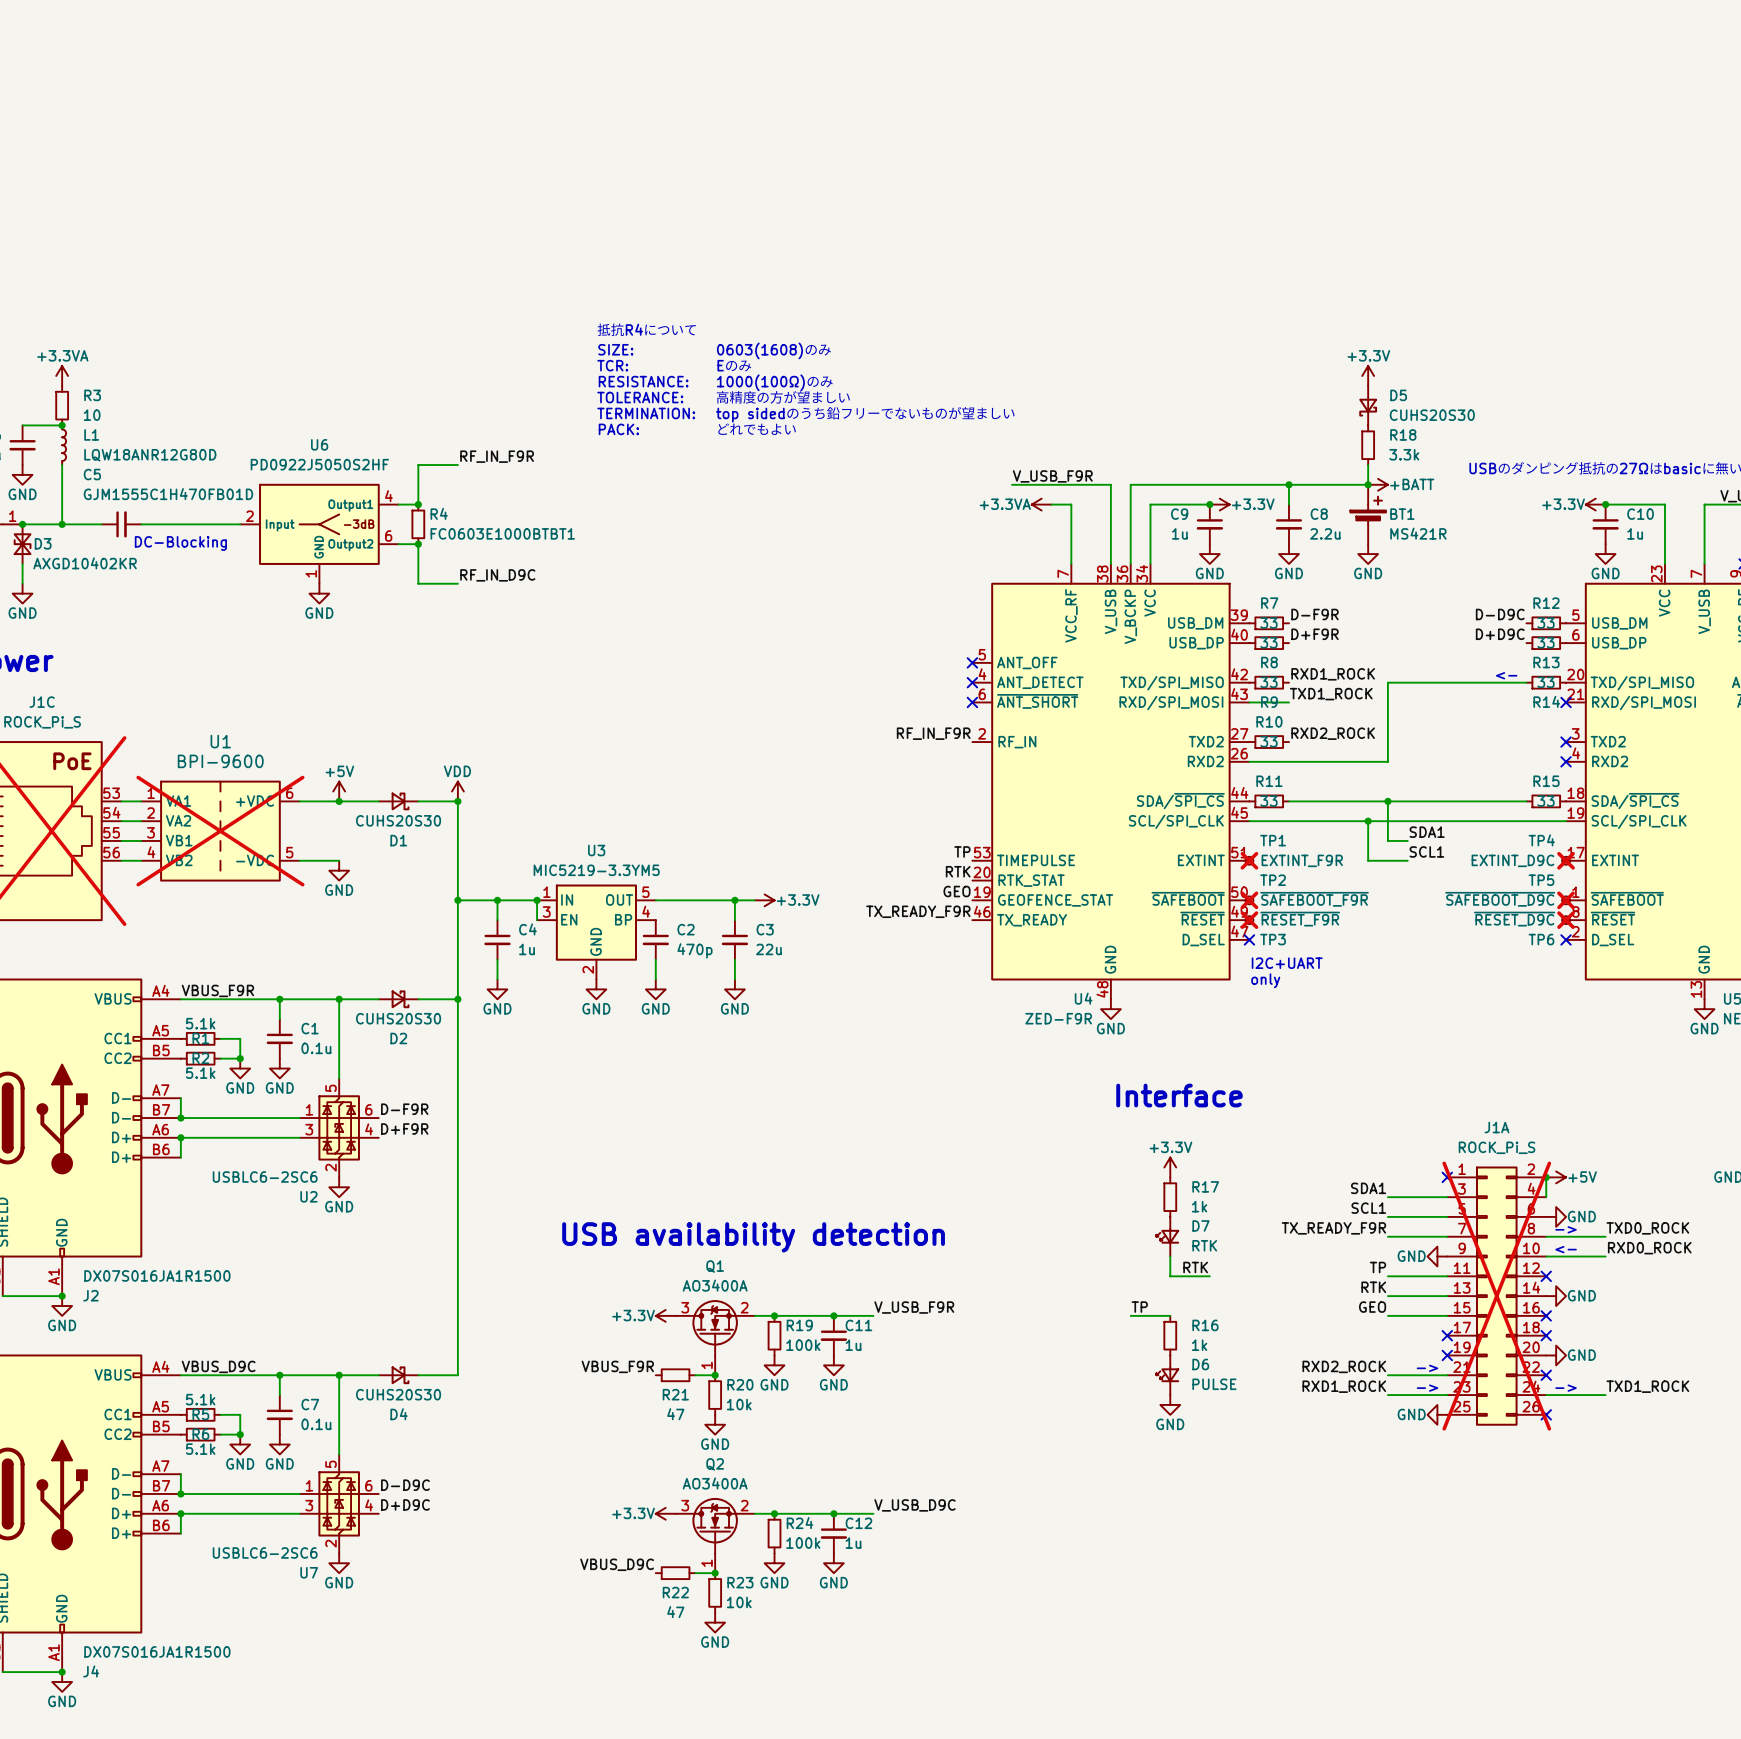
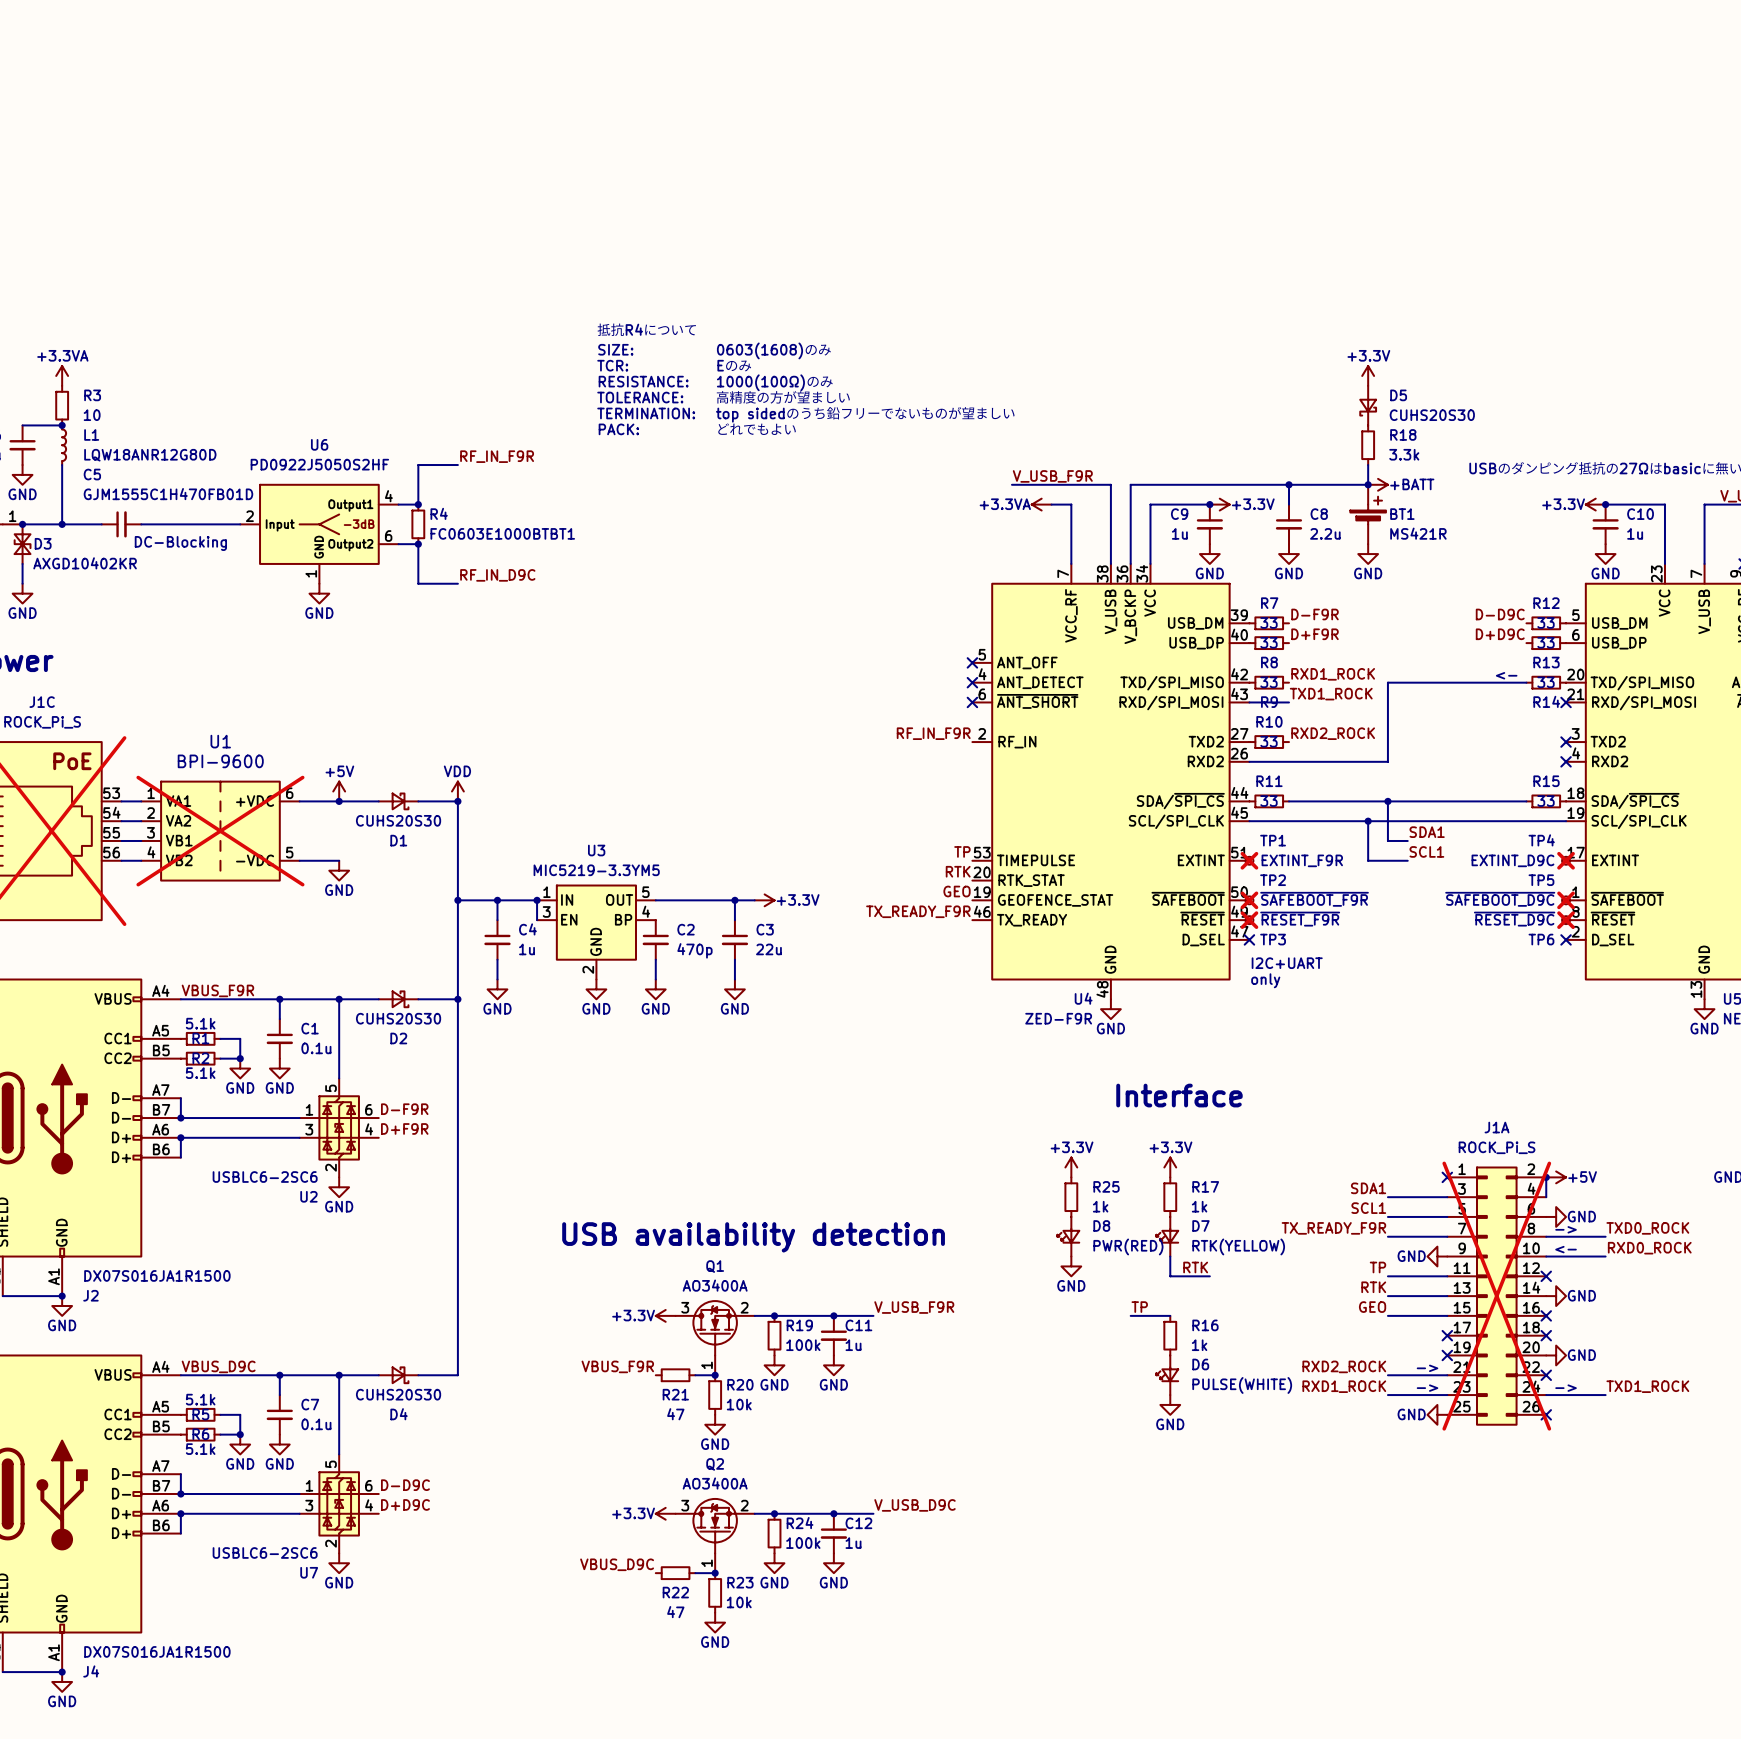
power symbol: none -> +3.3V (1071, 1167)
R25: none -> 1k (1071, 1197)
D8: none -> PWR(RED) (1068, 1236)
D7 value: RTK (1204, 1245) -> RTK(YELLOW) (1238, 1246)
power symbol: none -> GND (1071, 1266)
D6 value: PULSE (1214, 1384) -> PULSE(WHITE) (1242, 1385)

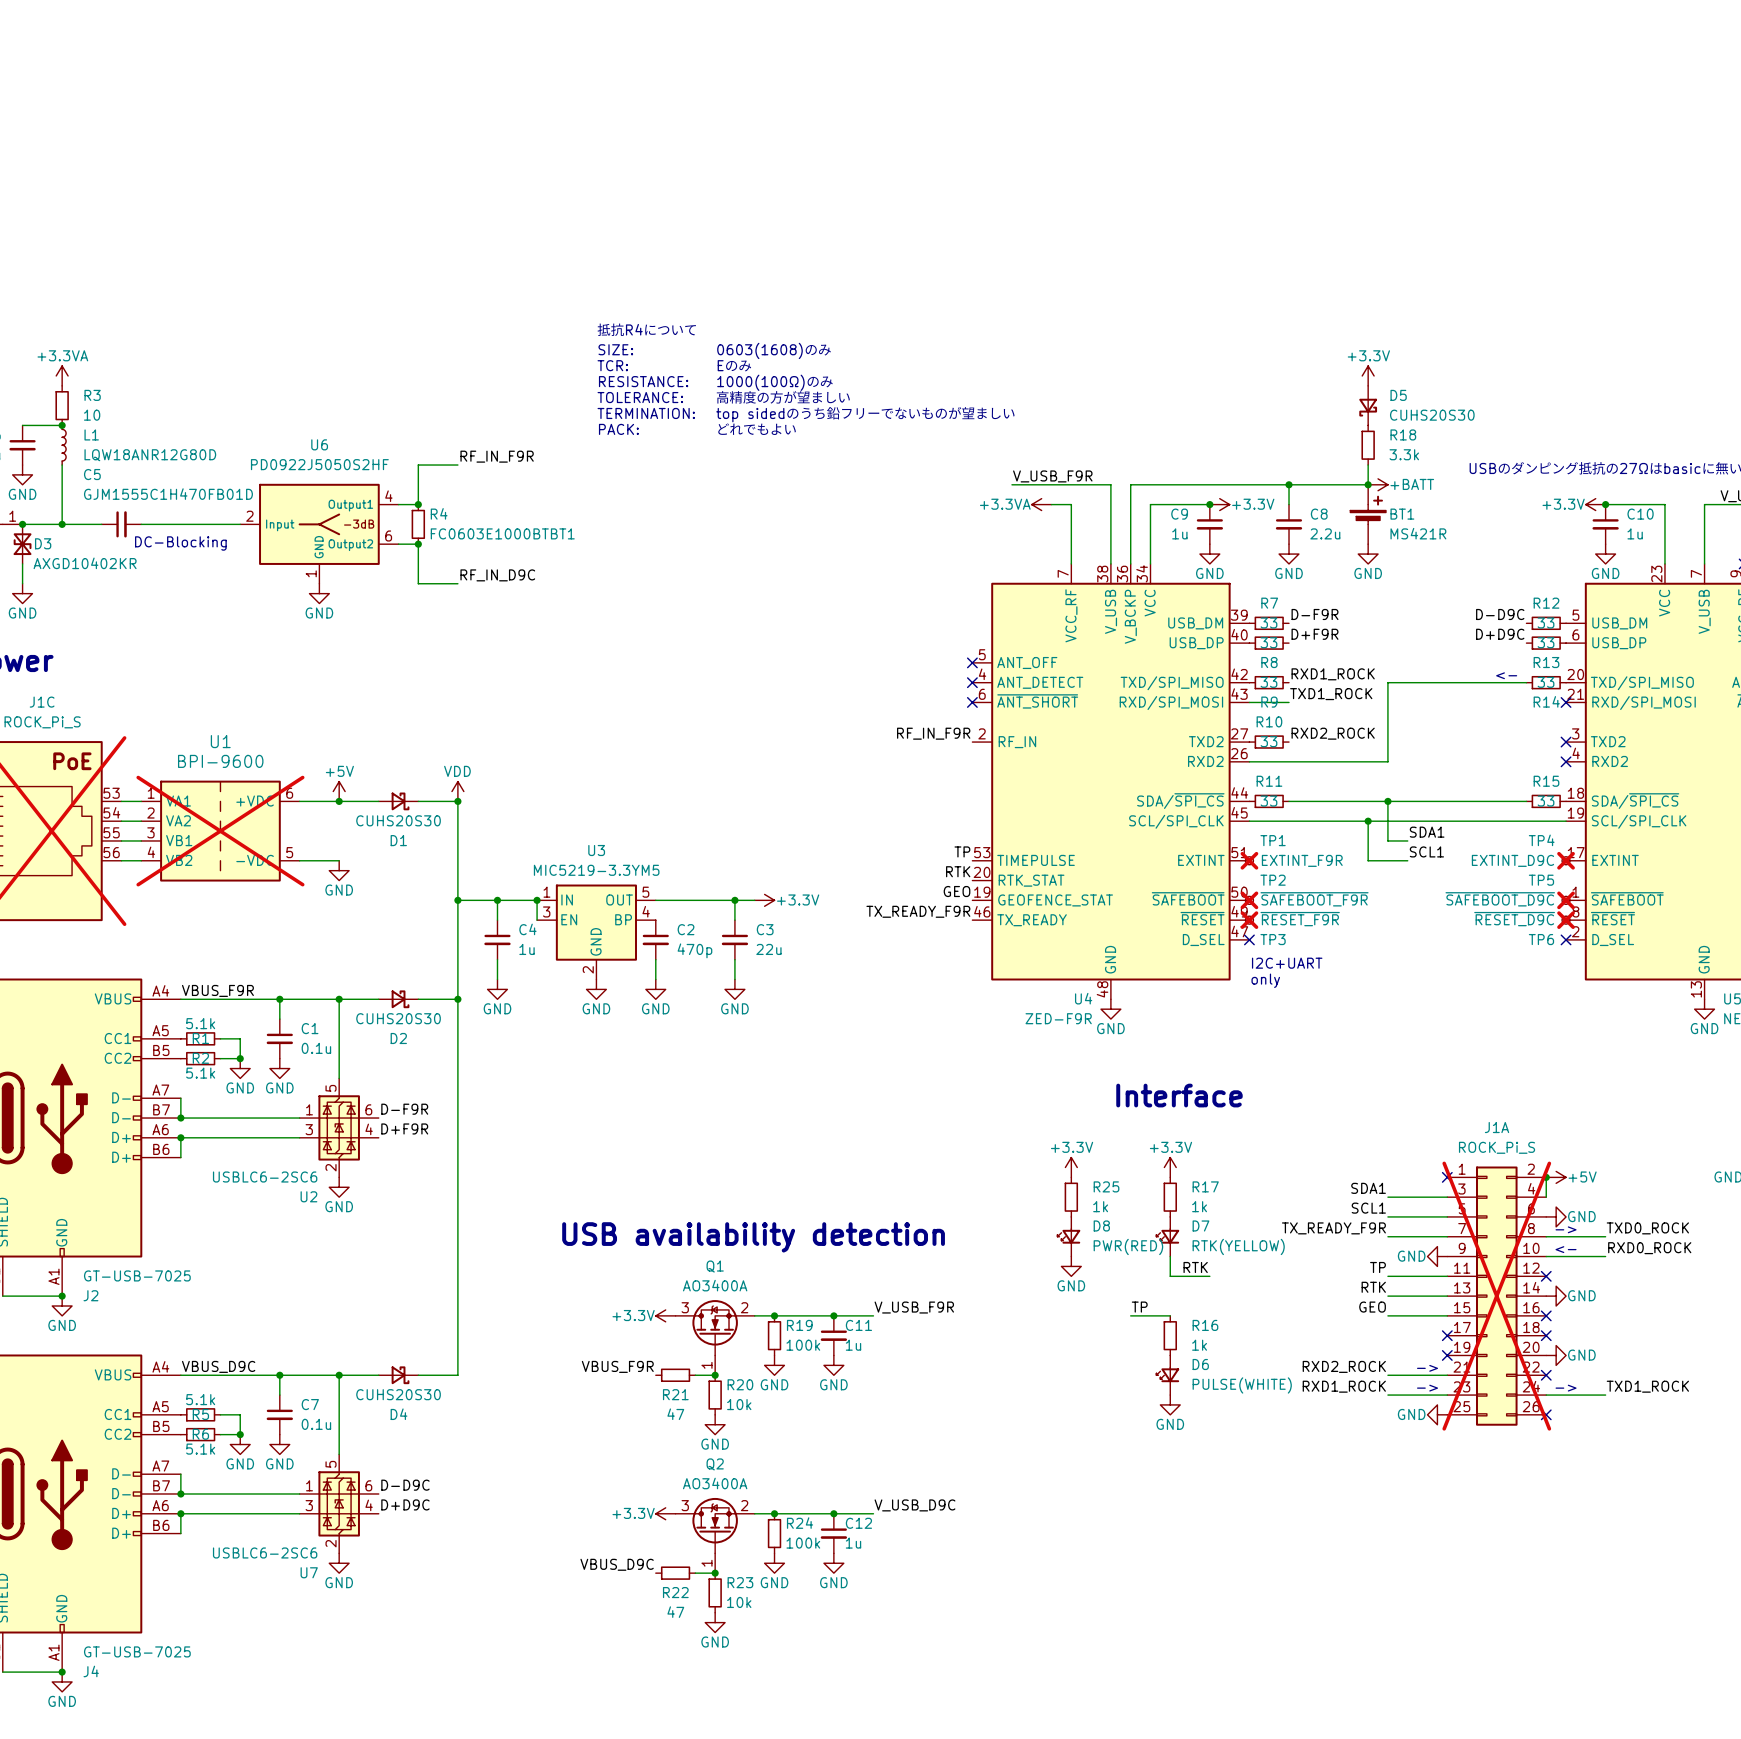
J2 value: DX07S016JA1R1500 (157, 1275) -> GT-USB-7025 (137, 1275)
J4 value: DX07S016JA1R1500 (157, 1651) -> GT-USB-7025 (137, 1651)

